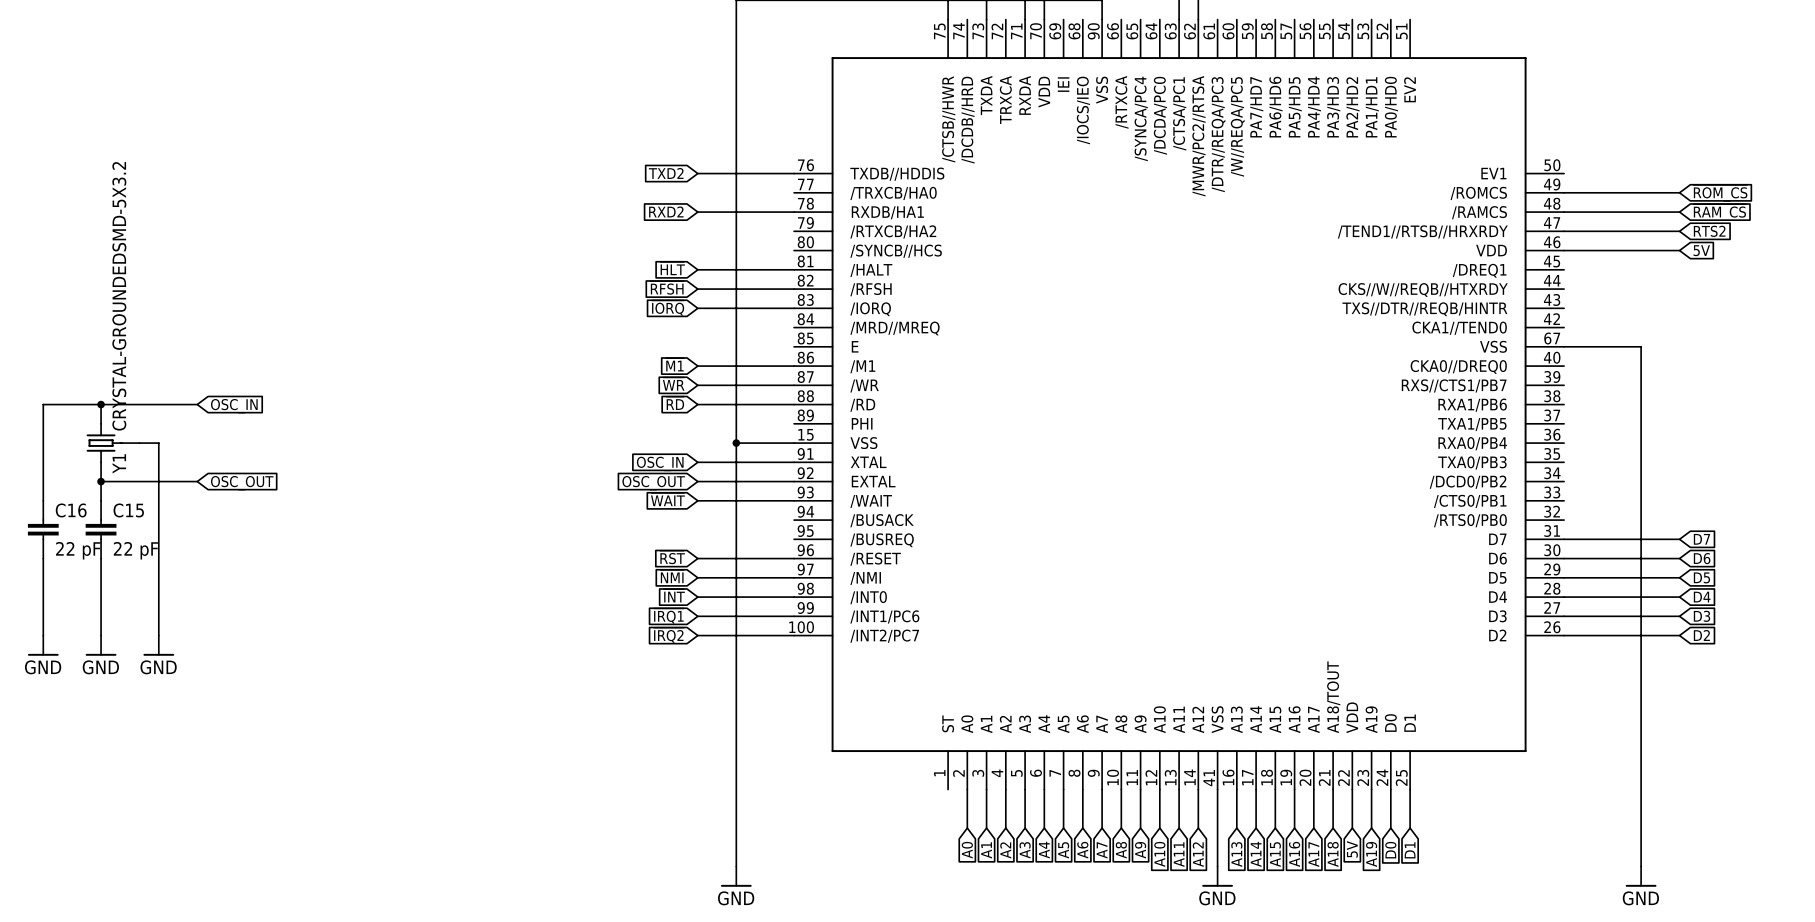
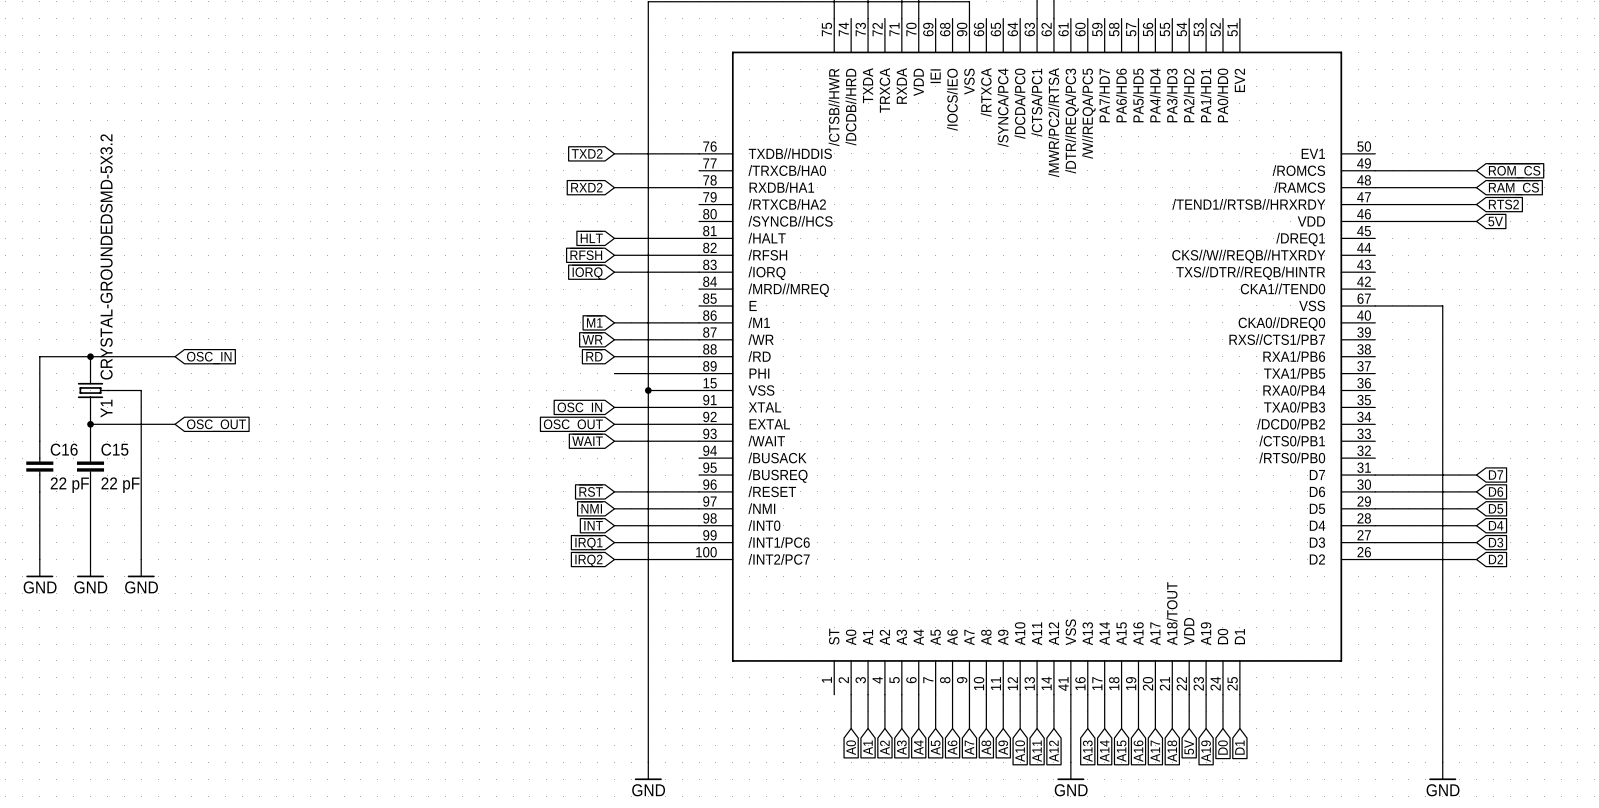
wire: none -> (614, 373) (699, 373)

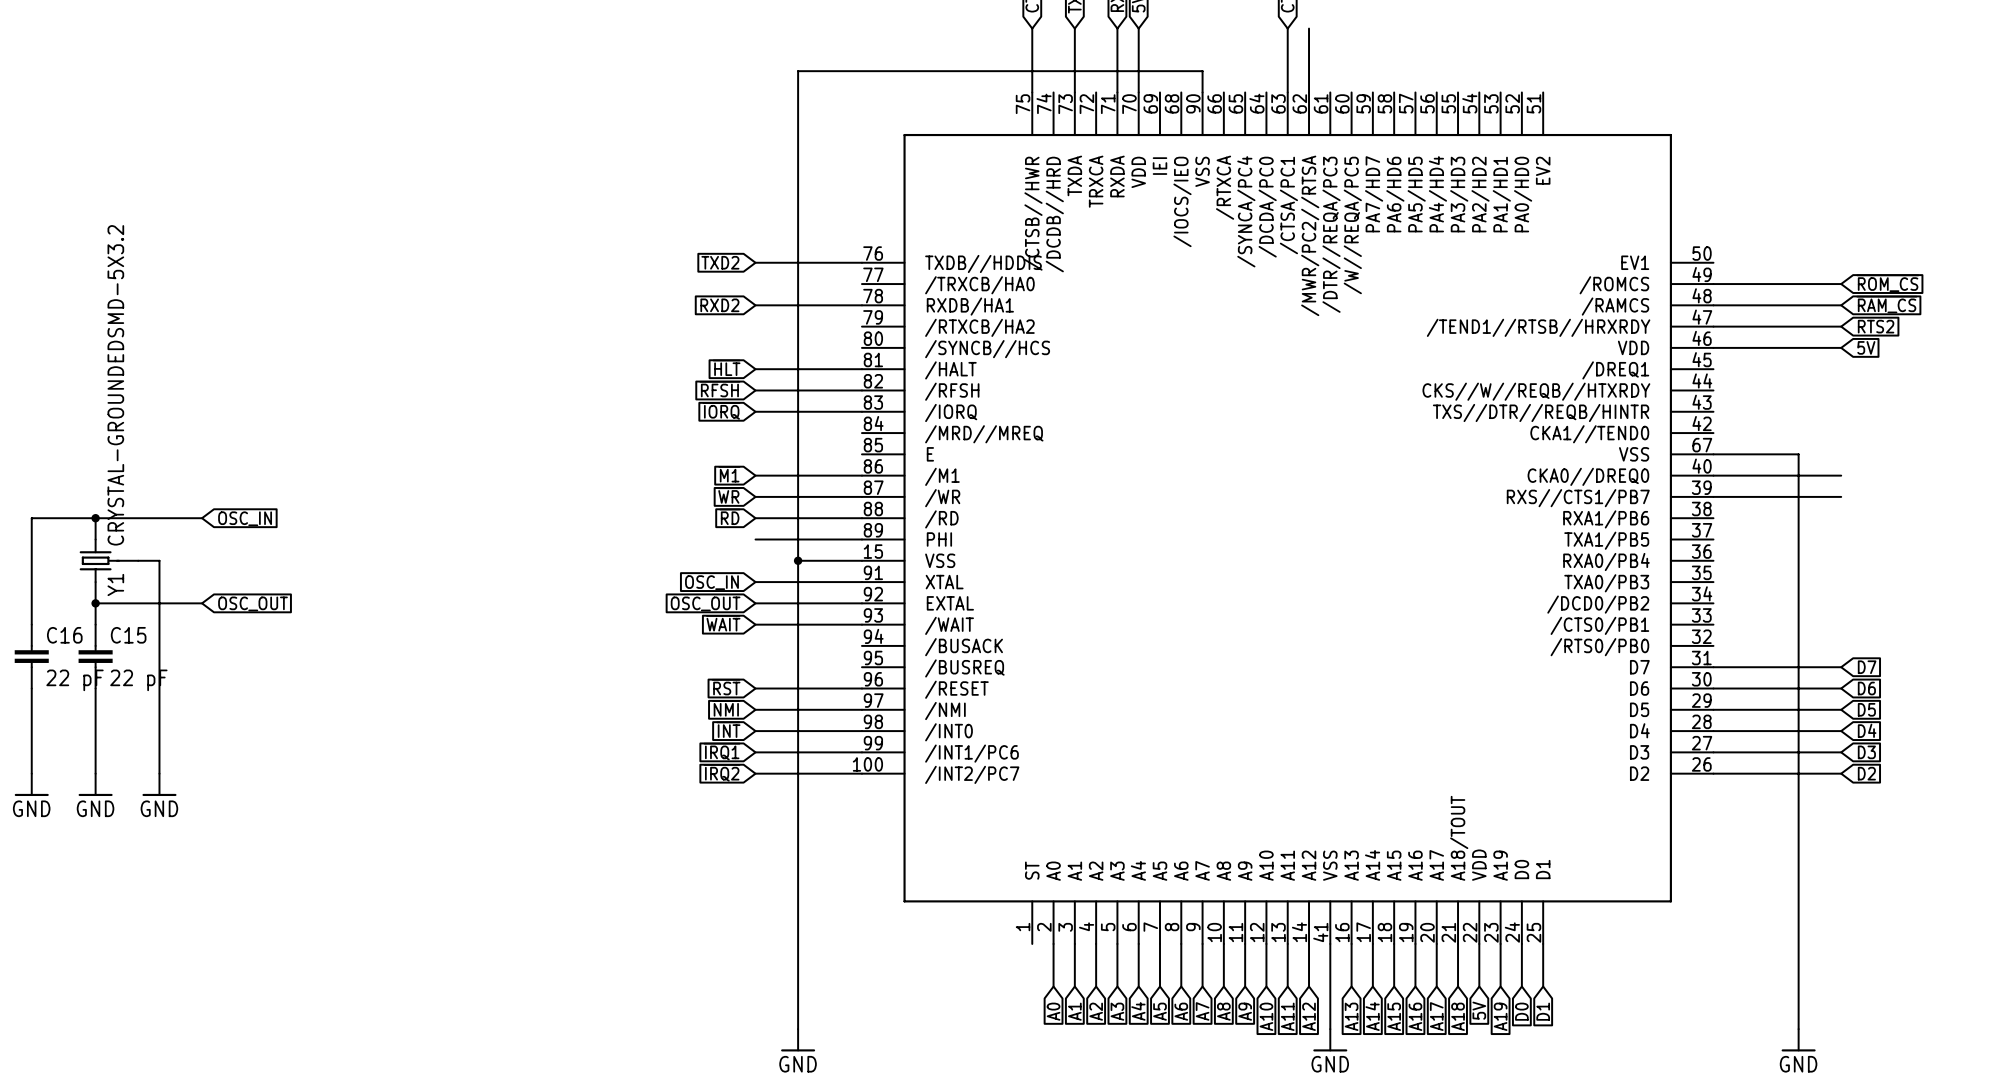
wire: none -> (1713, 475) (1841, 475)
wire: none -> (1713, 496) (1841, 496)

